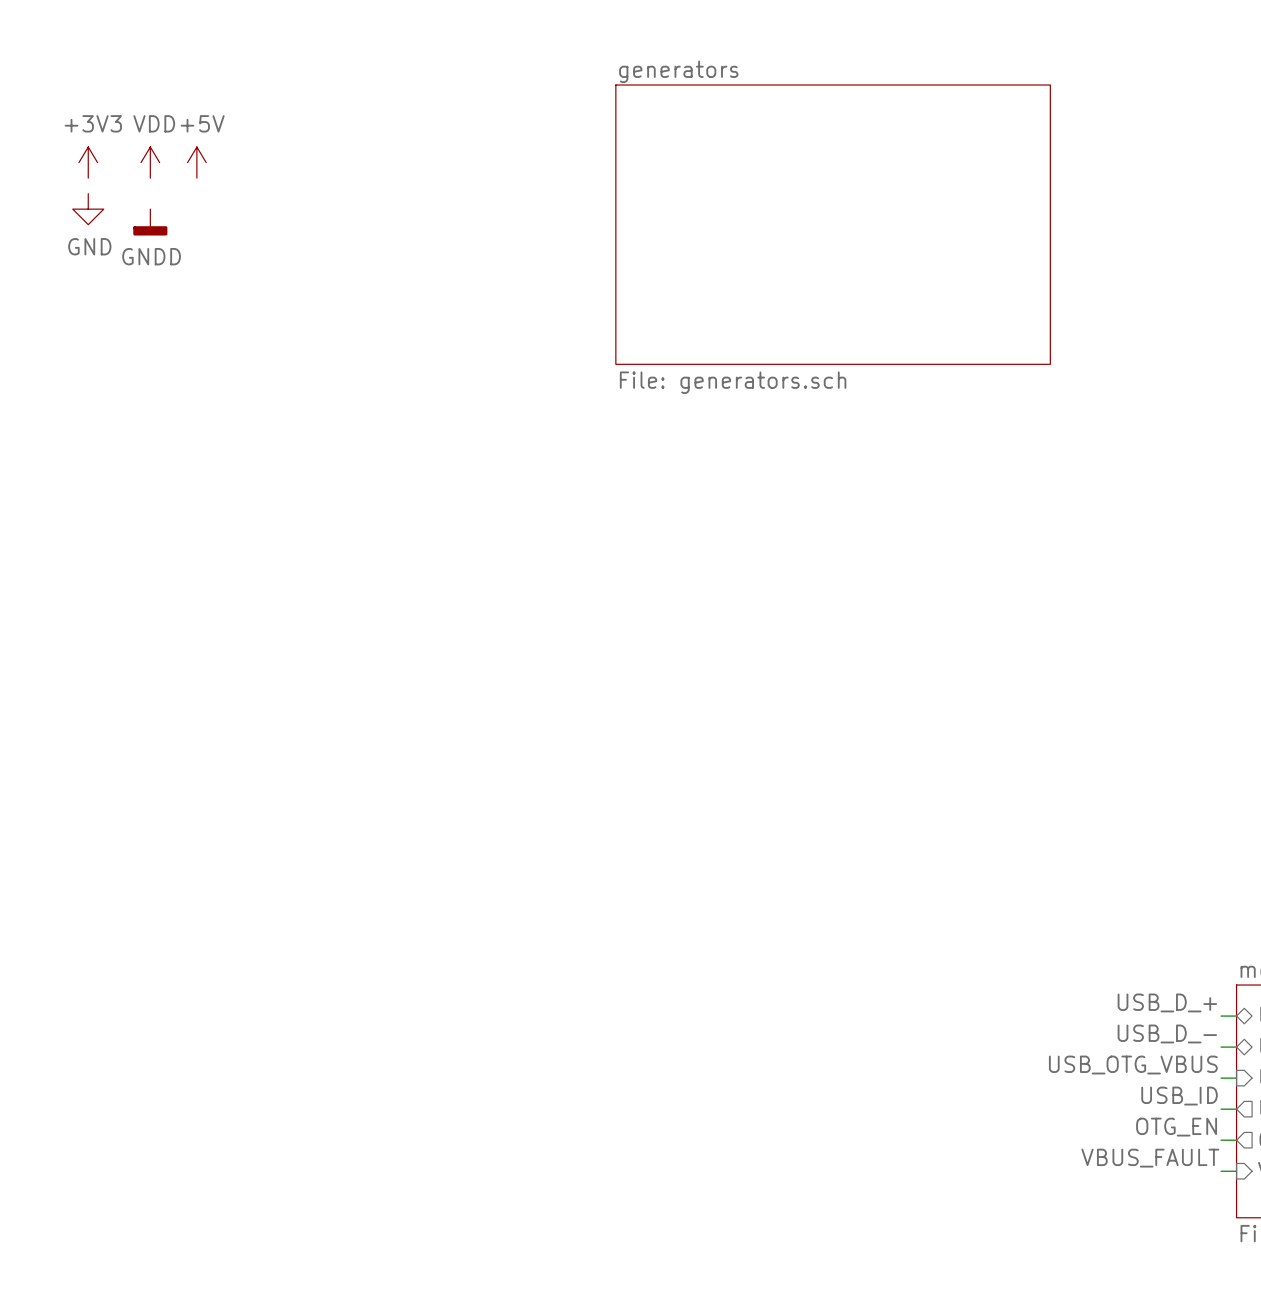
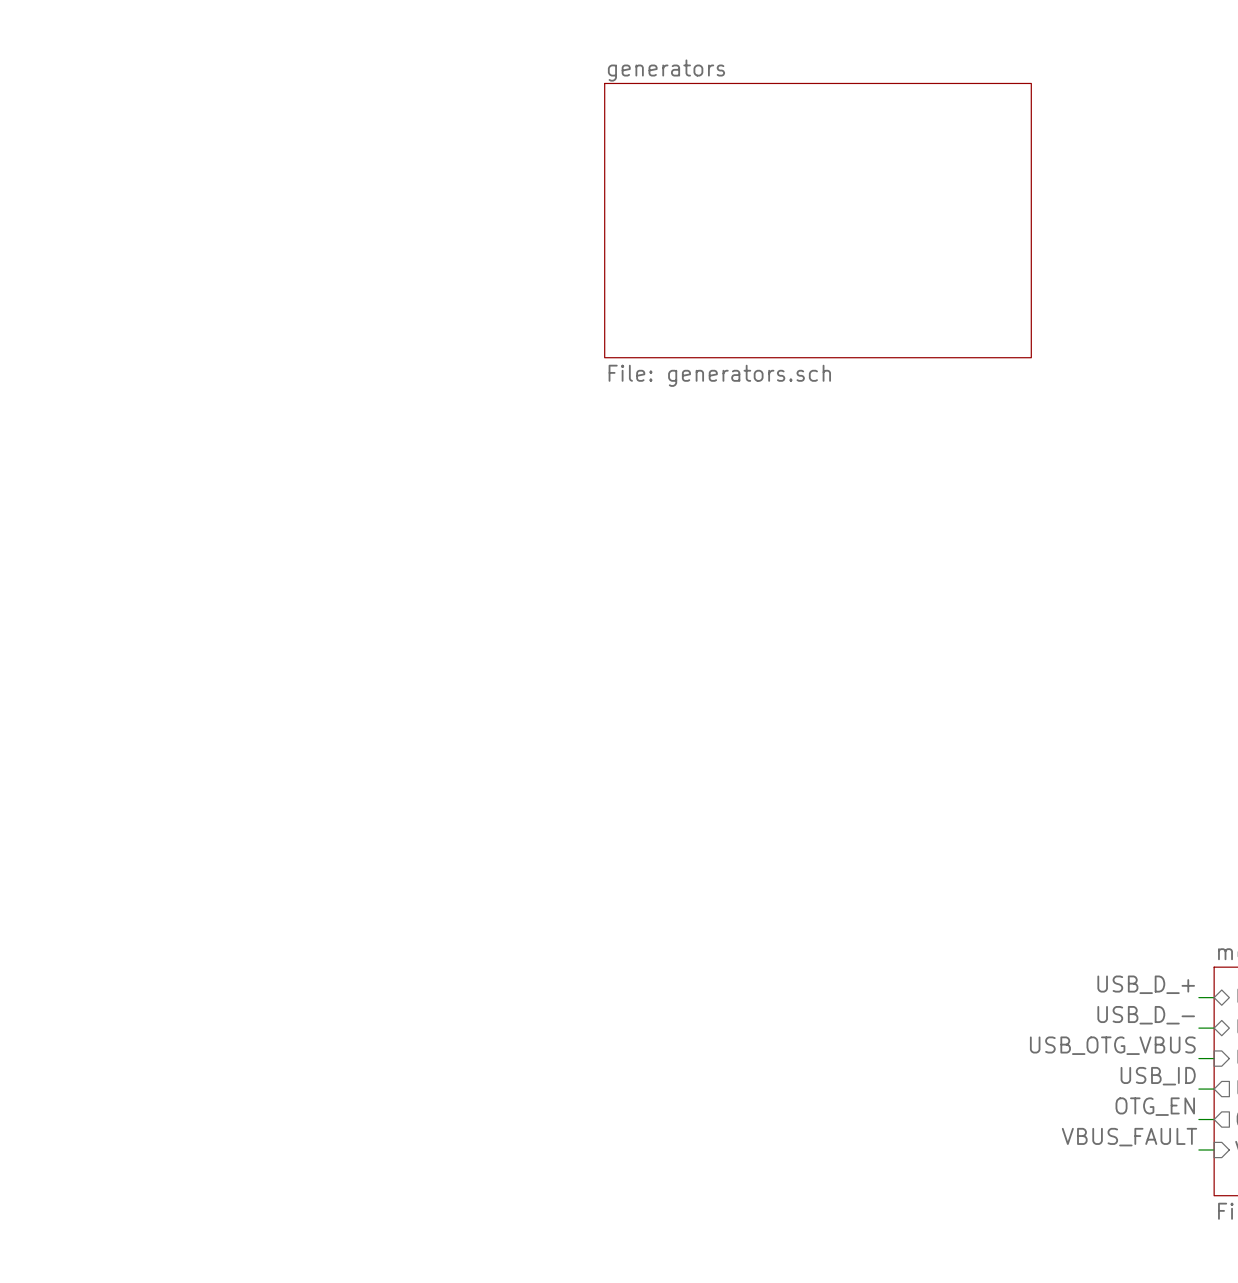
power symbol: +3V3 (88, 162) -> none
power symbol: VDD (150, 162) -> none
power symbol: +5V (196, 162) -> none
power symbol: GND (88, 209) -> none
power symbol: GNDD (150, 222) -> none

